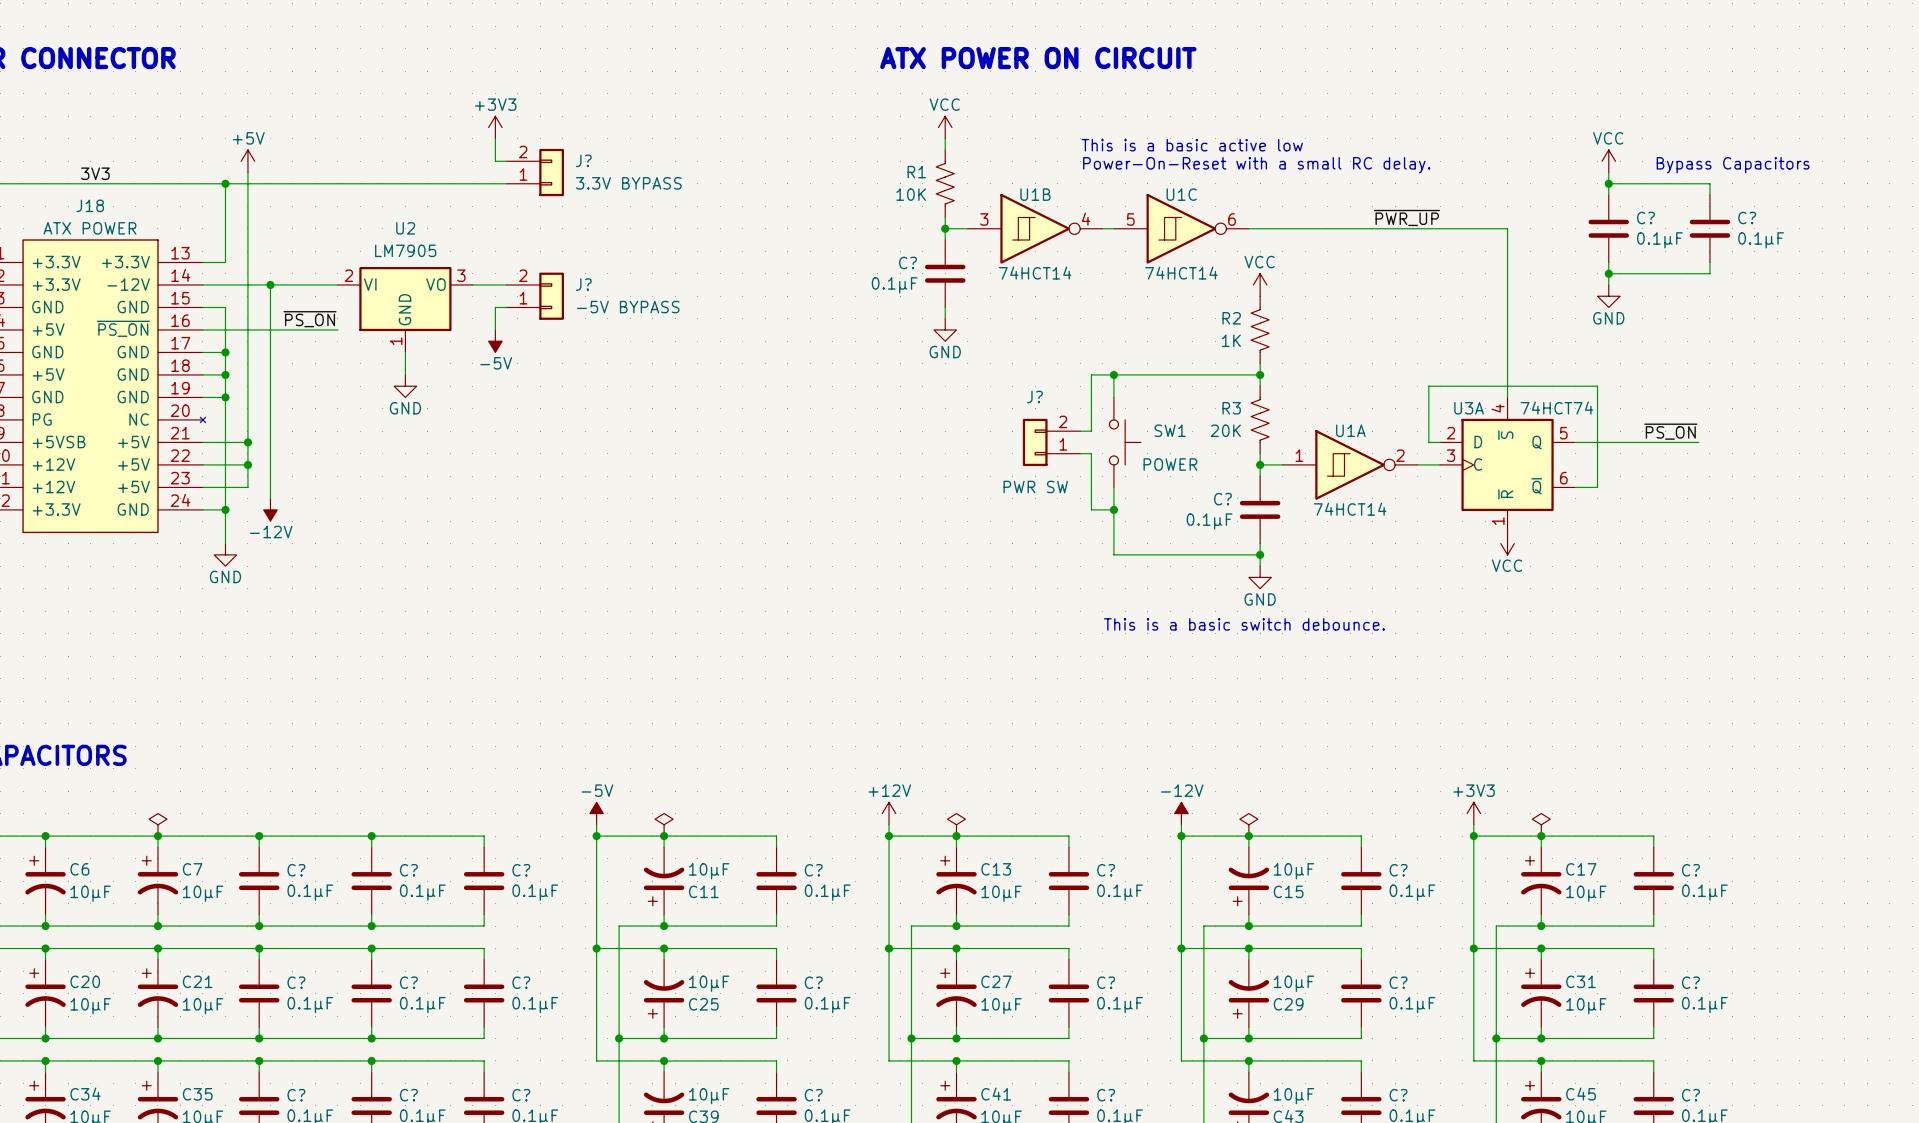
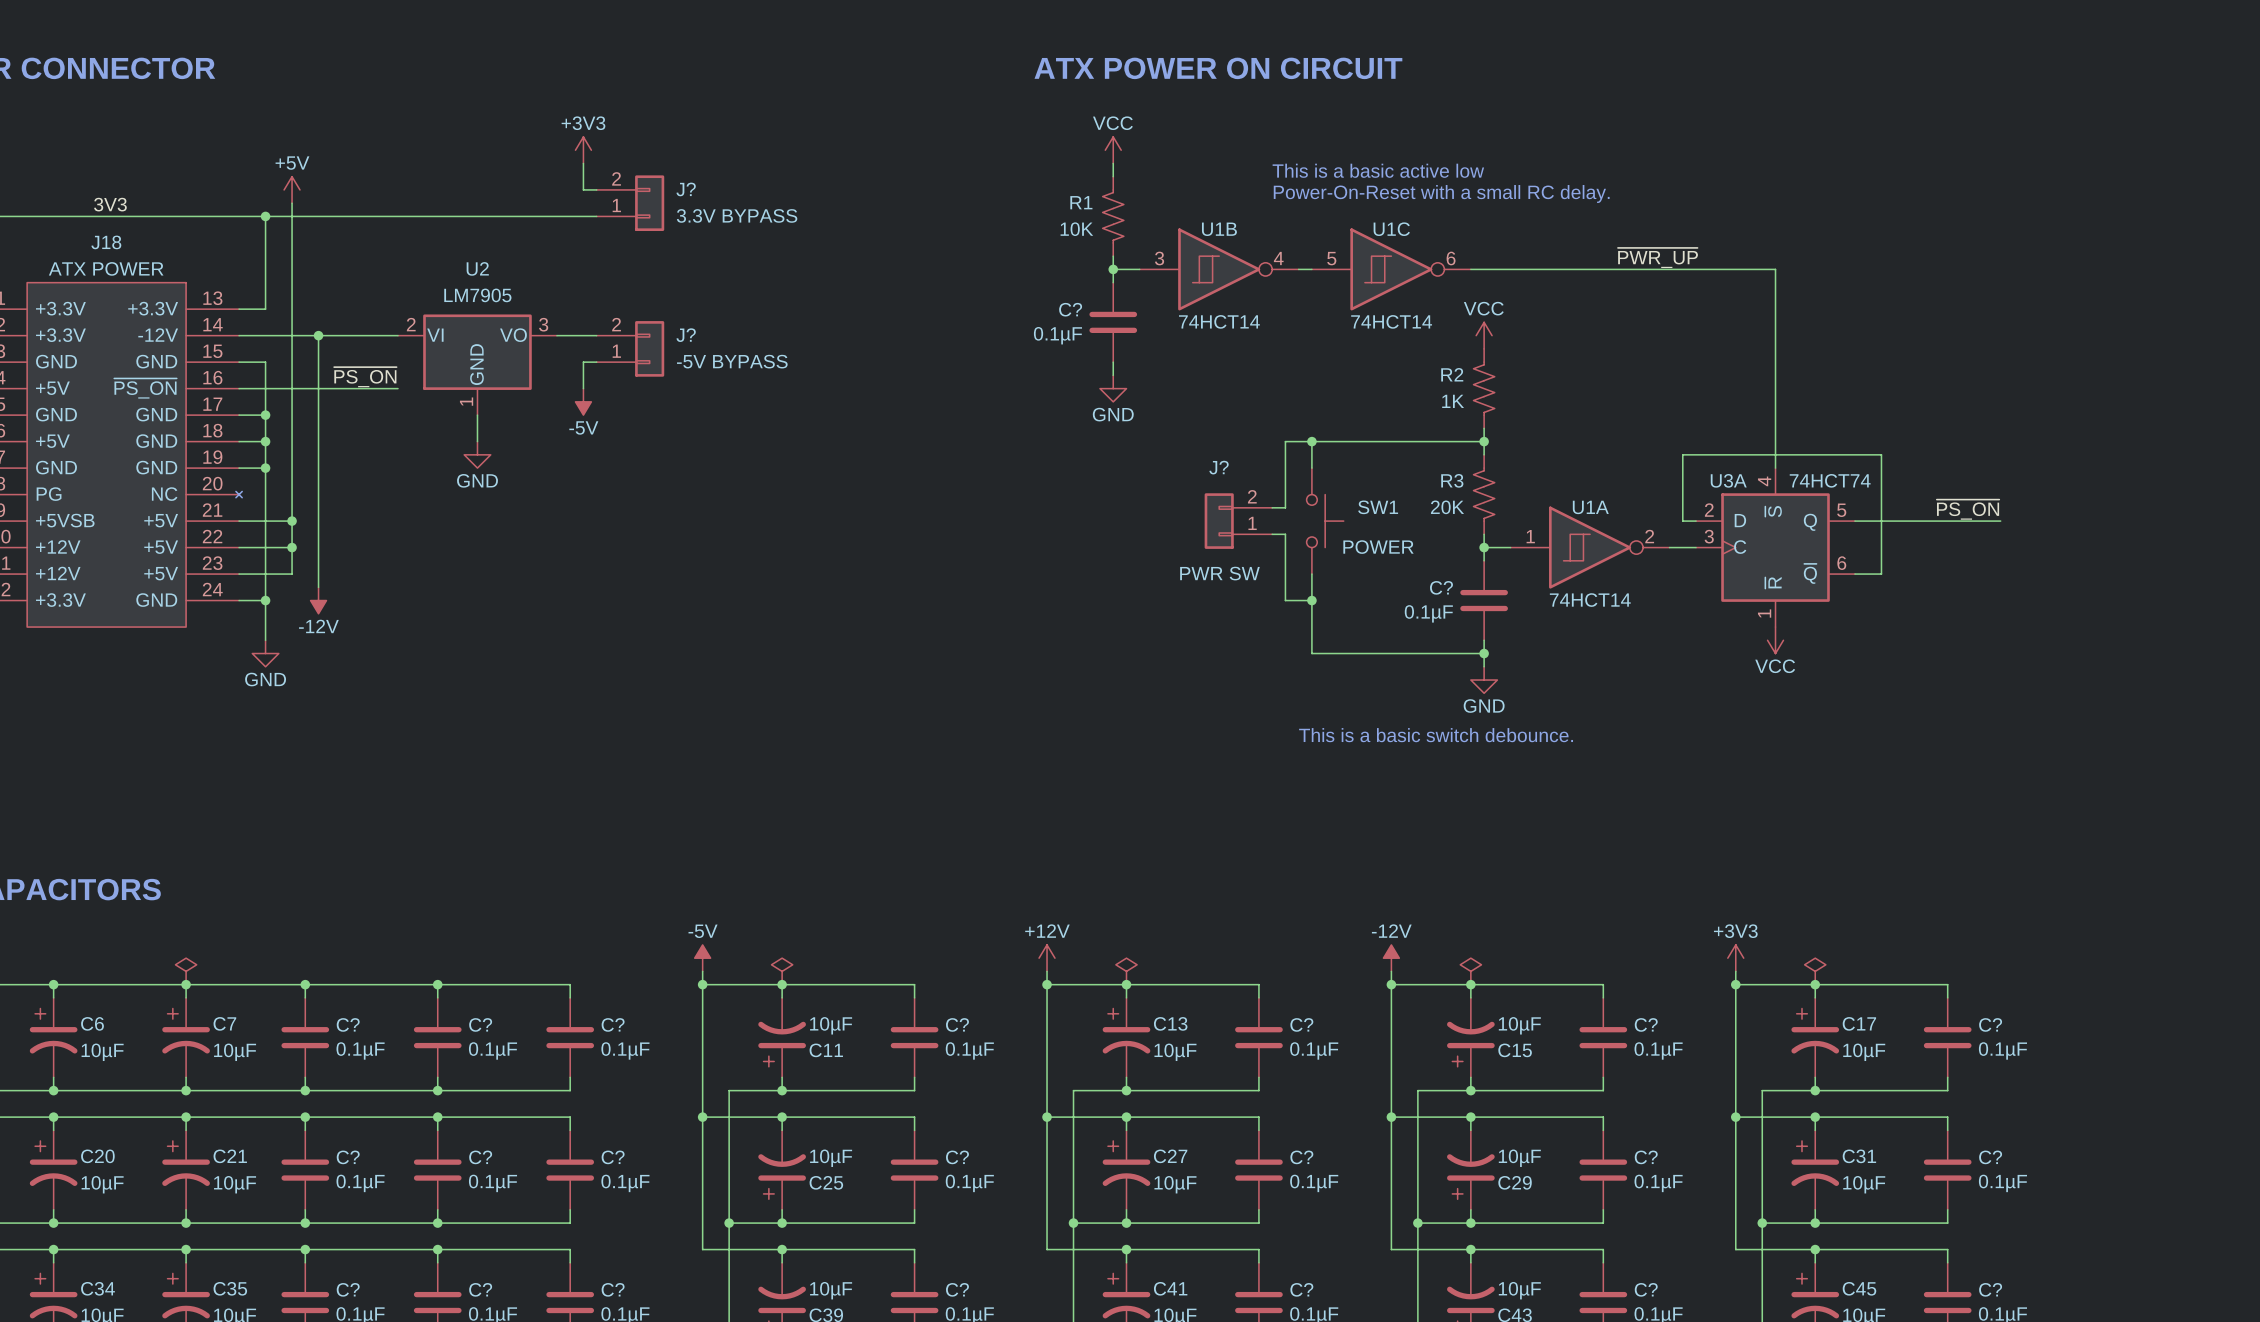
power symbol: VCC (1608, 161) -> none
text: Bypass Capacitors (1733, 165) -> none
wire: (1608, 172) (1608, 195) -> none
wire: (1608, 183) (1709, 183) (1709, 195) -> none
junction: (1608, 183) -> none
C?: 0.1µF (1608, 228) -> none
C?: 0.1µF (1709, 228) -> none
wire: (1608, 262) (1608, 284) -> none
wire: (1709, 262) (1709, 273) (1608, 273) -> none
junction: (1608, 273) -> none
power symbol: GND (1608, 296) -> none

